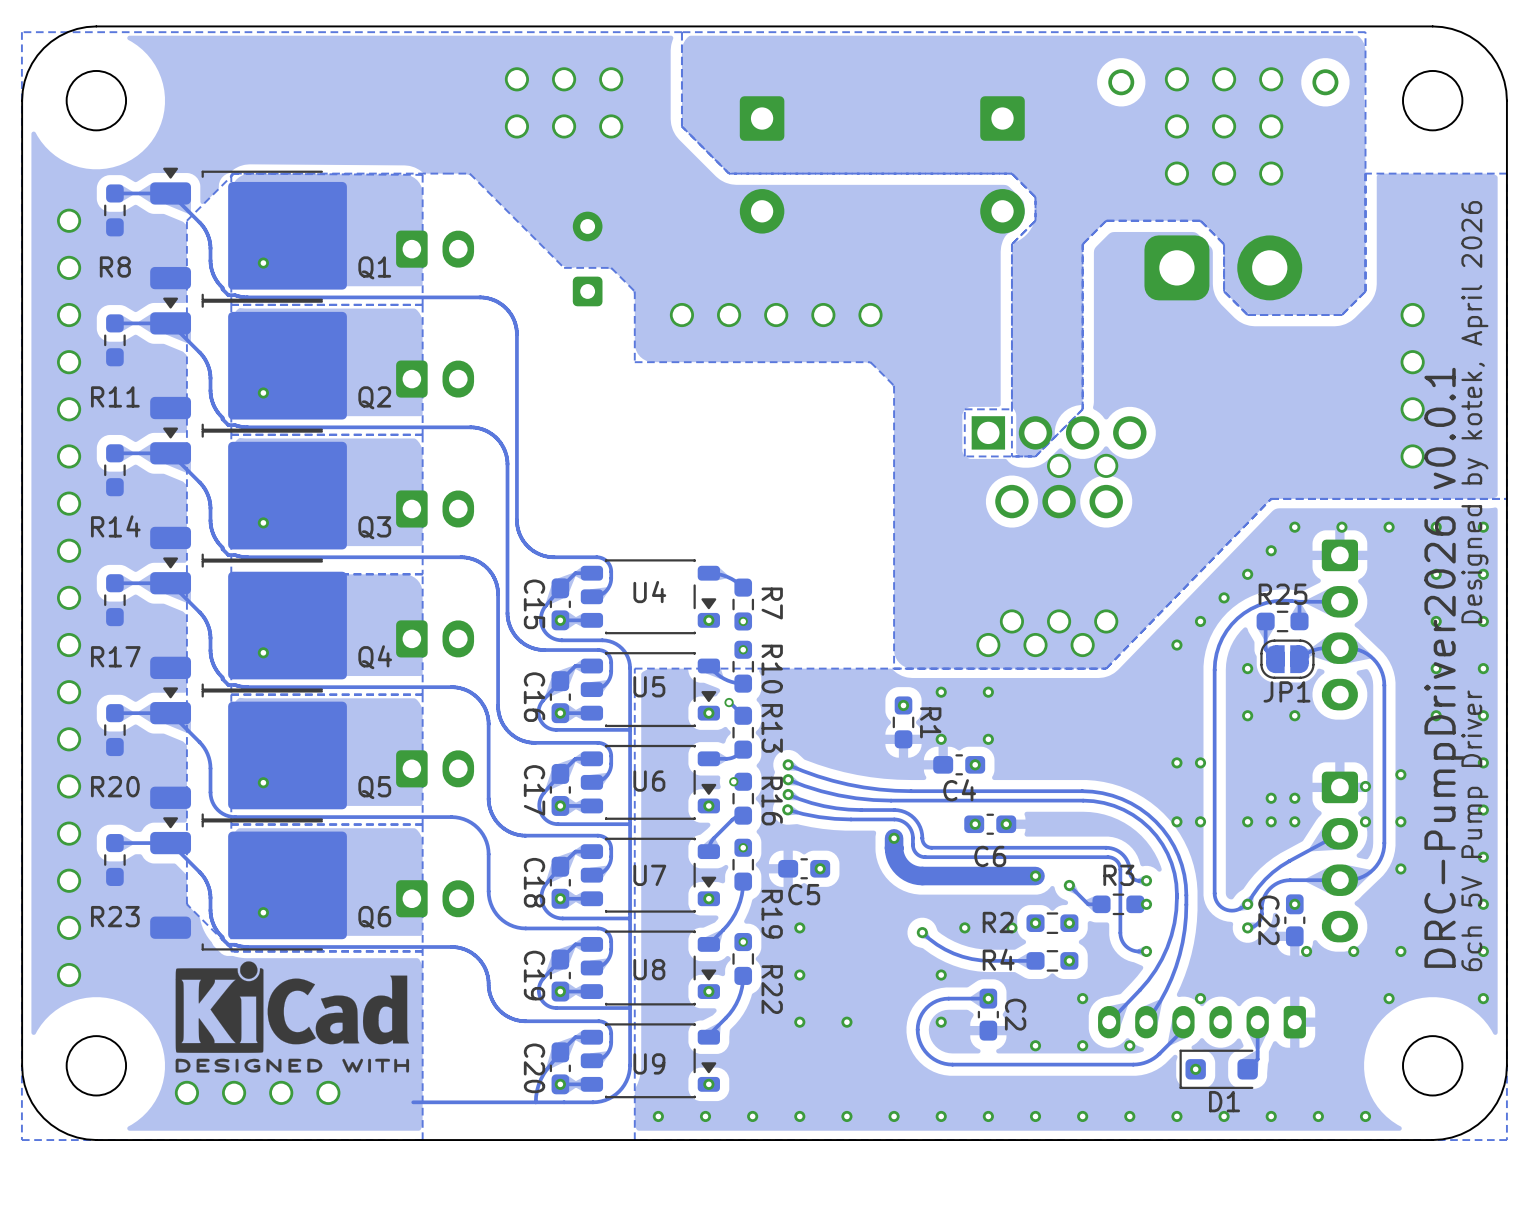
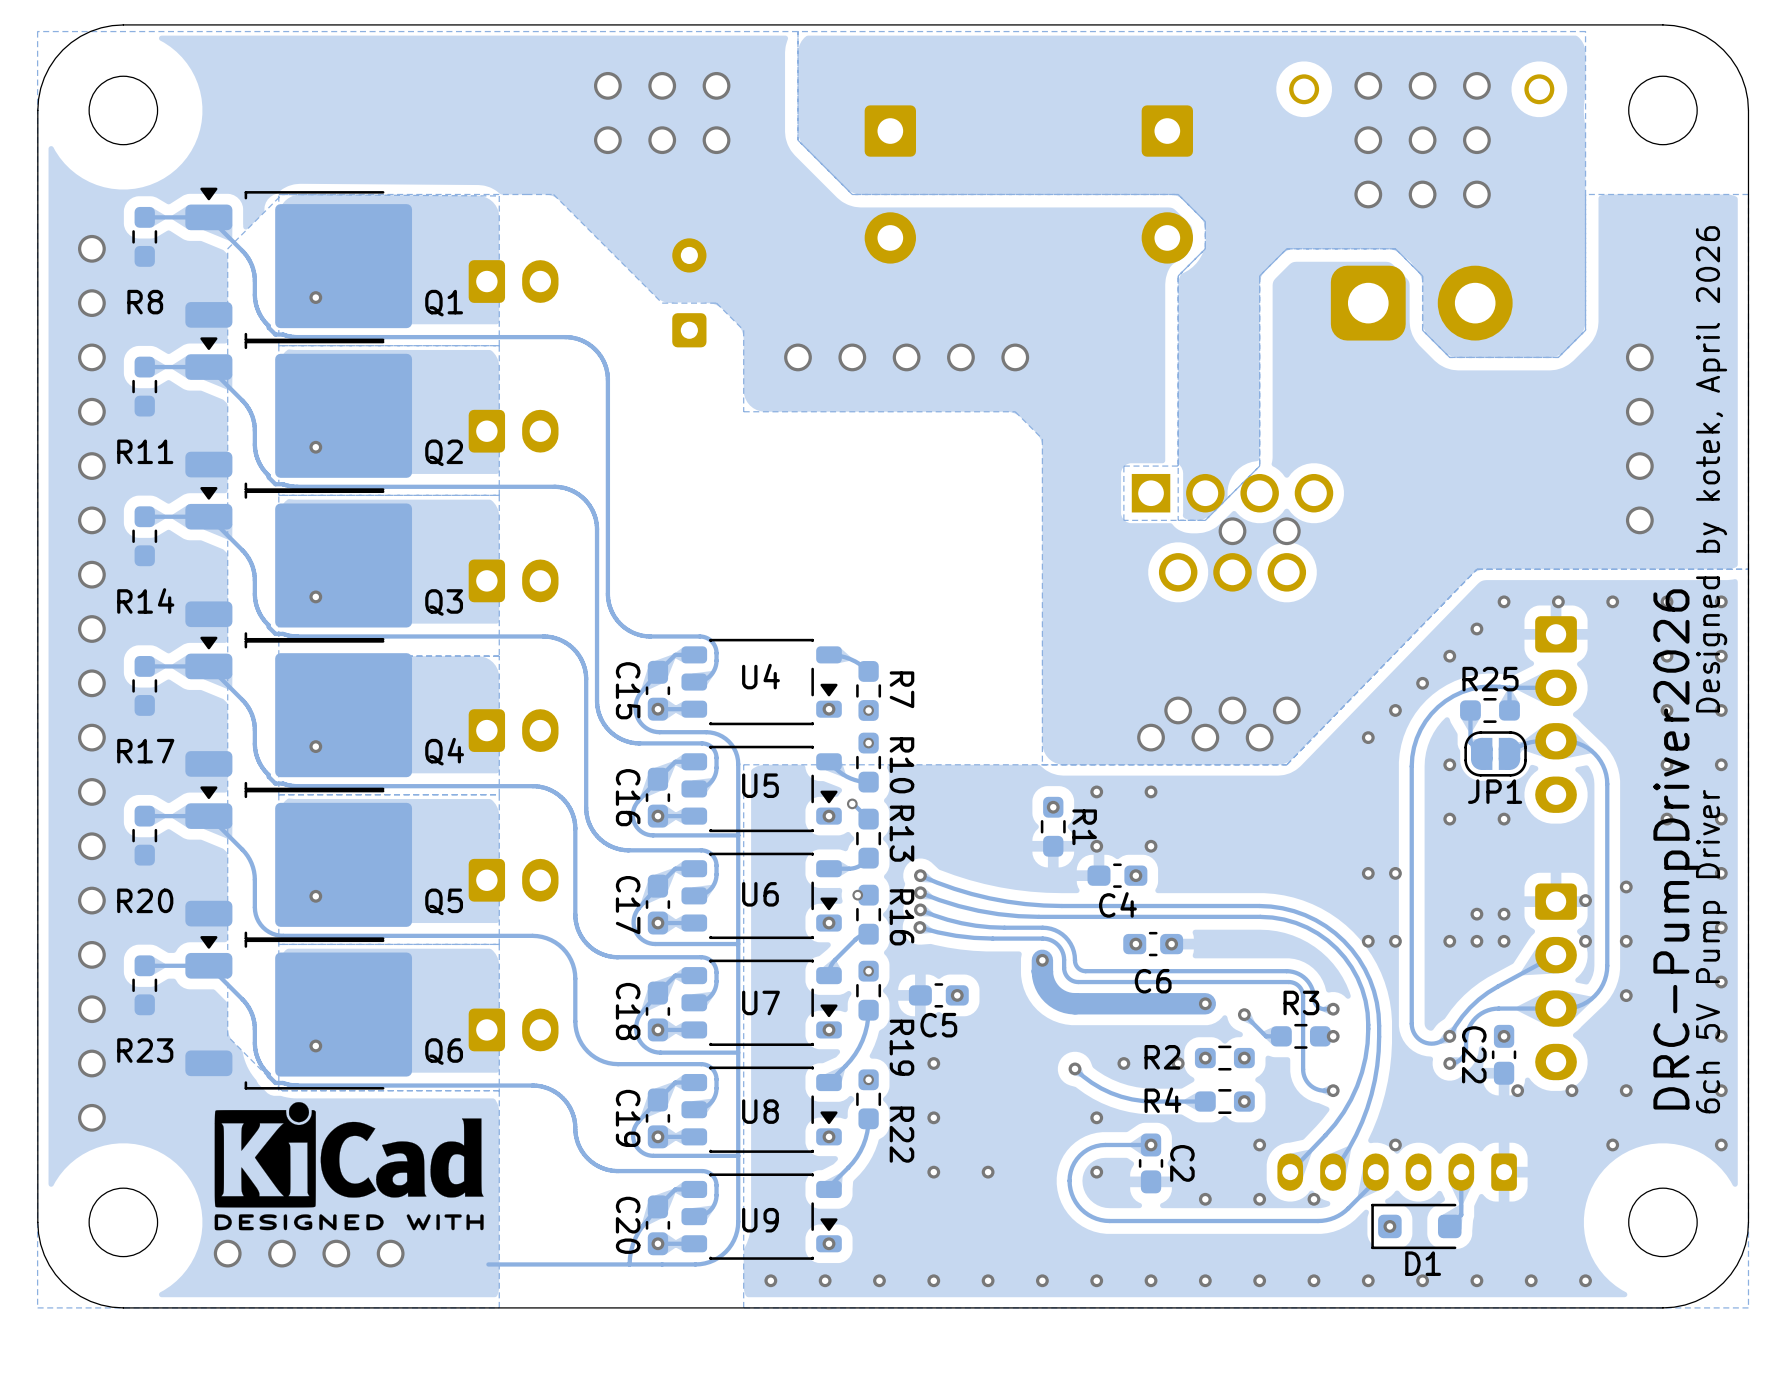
text: DRC-PumpDriver2026 v0.0.1 (1444, 667) -> DRC-PumpDriver2026 (1676, 849)

